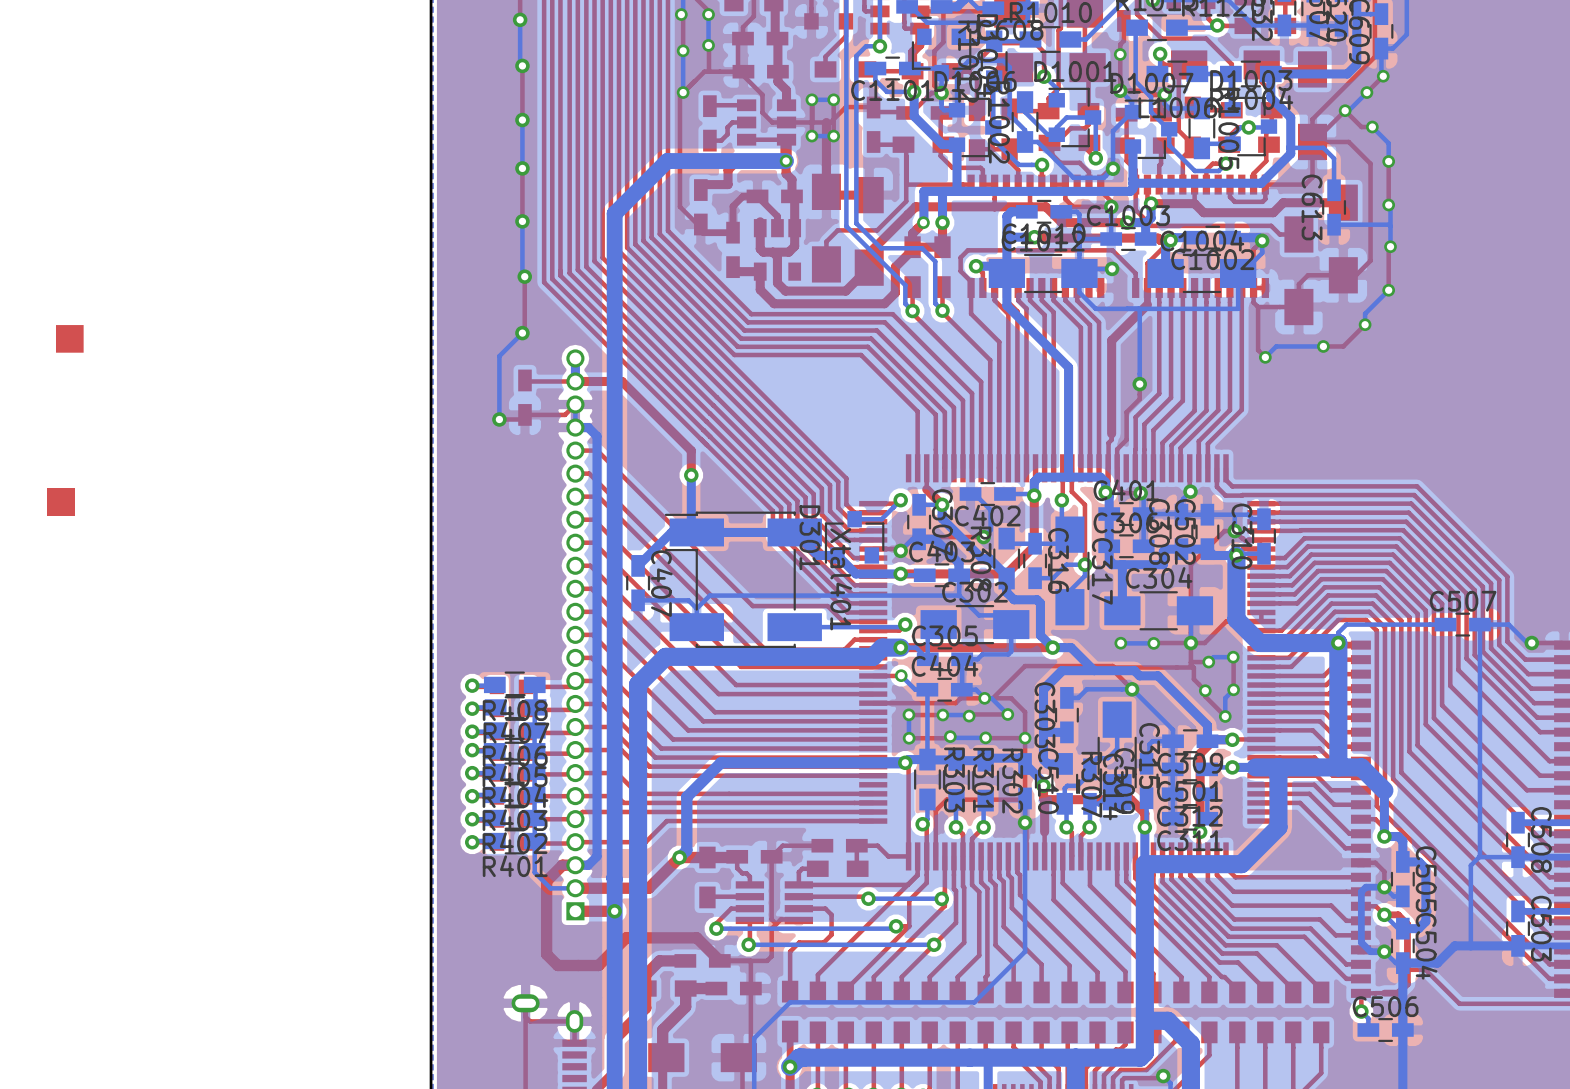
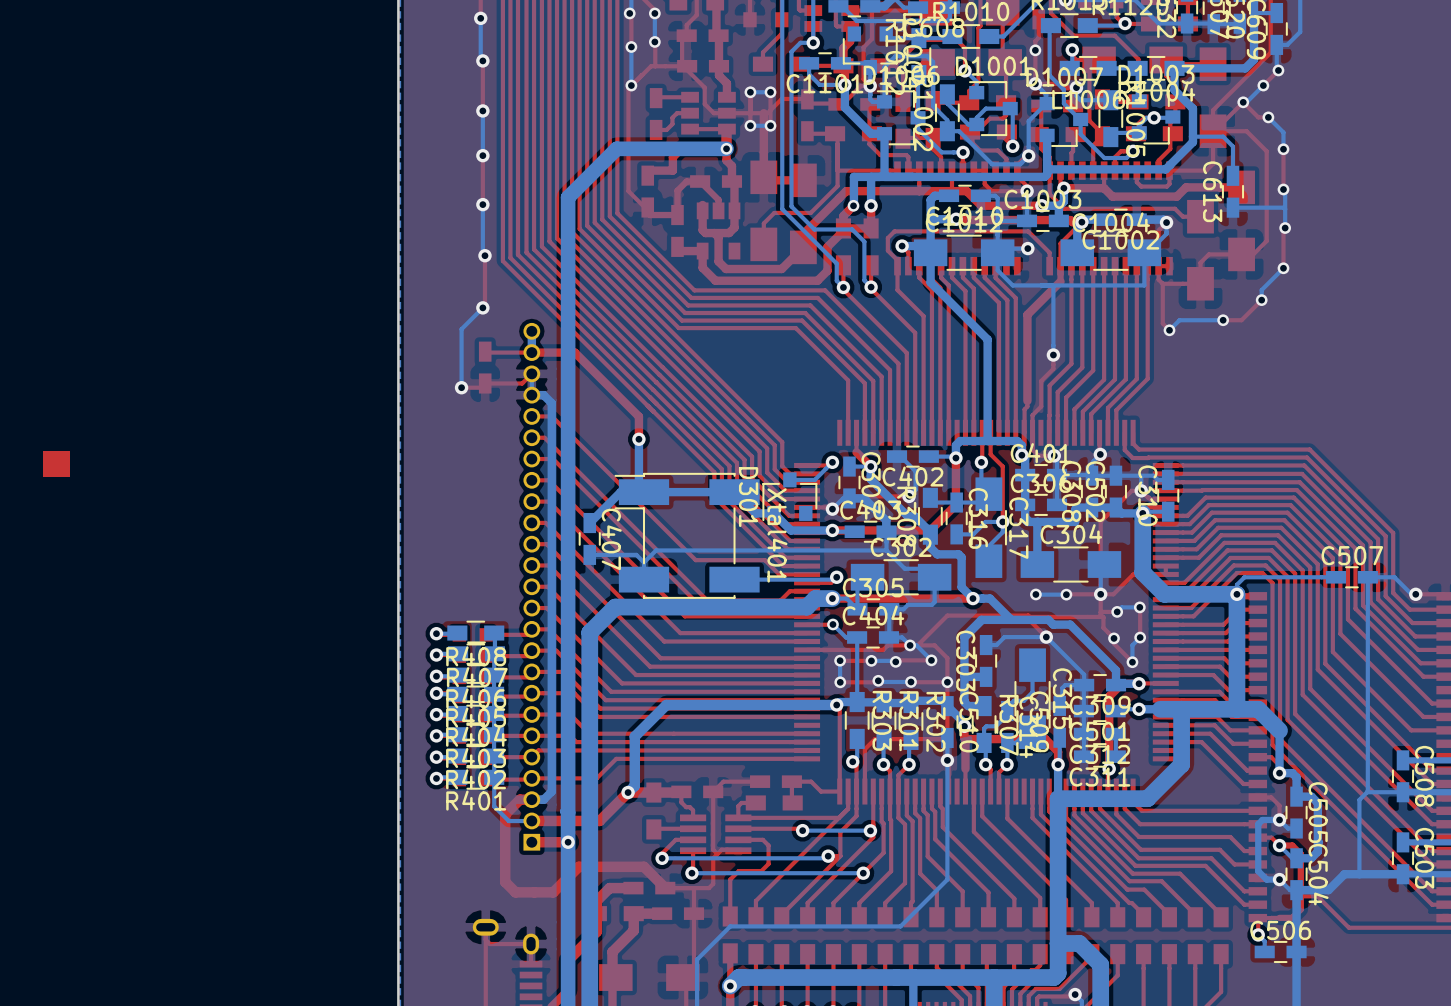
part: (69, 338) -> none

